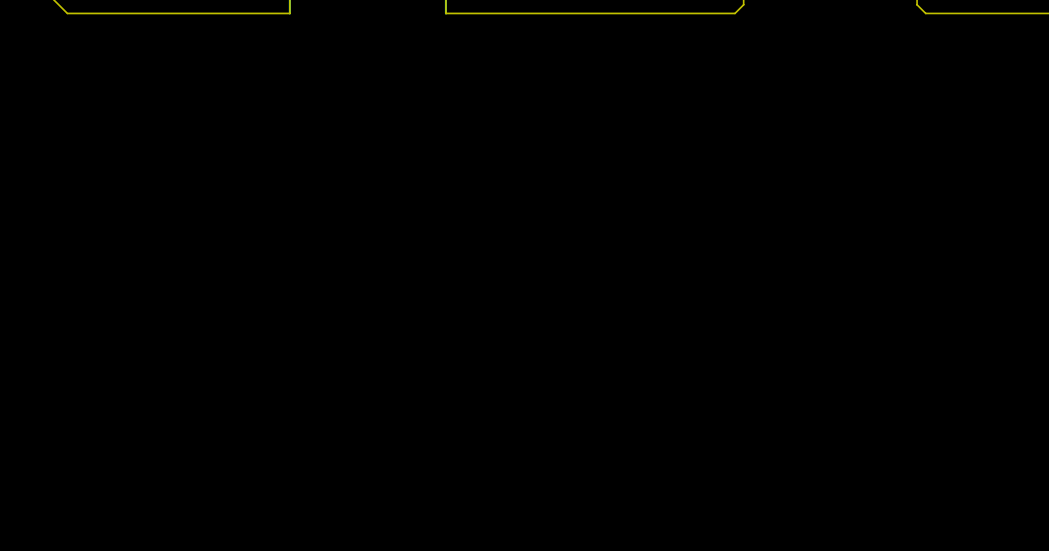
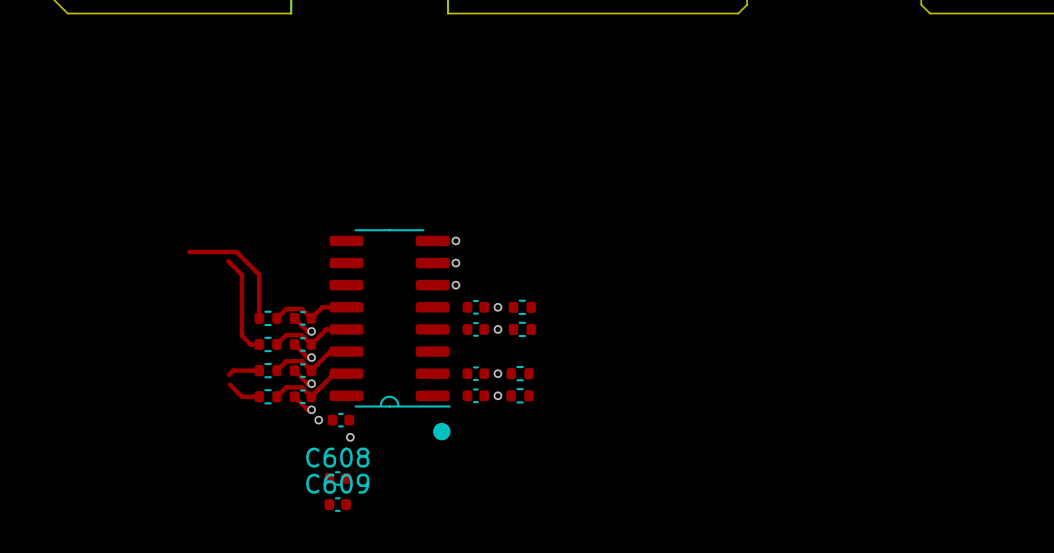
via: none -> (455, 240)
track: none -> (189, 251) (236, 251) (259, 274) (259, 318)
track: none -> (228, 261) (241, 274) (241, 335) (250, 344) (259, 344)
via: none -> (455, 263)
via: none -> (455, 285)
track: none -> (346, 307) (322, 307) (311, 318) (301, 308) (286, 308) (276, 318)
part: none -> (475, 307)
via: none -> (497, 307)
part: none -> (522, 307)
part: none -> (268, 318)
track: none -> (294, 318) (307, 331) (311, 331)
part: none -> (302, 318)
track: none -> (346, 329) (326, 329) (311, 344) (301, 335) (286, 335) (276, 344)
part: none -> (475, 329)
via: none -> (497, 329)
part: none -> (522, 329)
via: none -> (311, 331)
part: none -> (390, 334)
part: none -> (268, 344)
track: none -> (294, 344) (307, 357) (311, 357)
part: none -> (302, 344)
track: none -> (346, 351) (330, 351) (311, 370) (301, 361) (286, 361) (276, 370)
via: none -> (311, 357)
track: none -> (259, 370) (233, 370) (228, 374)
part: none -> (268, 370)
track: none -> (294, 370) (307, 383) (311, 383)
part: none -> (302, 370)
track: none -> (346, 373) (334, 373) (311, 396) (301, 387) (286, 387) (276, 396)
part: none -> (475, 373)
via: none -> (497, 373)
part: none -> (520, 373)
via: none -> (311, 383)
track: none -> (229, 384) (241, 396) (259, 396)
part: none -> (475, 395)
via: none -> (497, 395)
part: none -> (520, 395)
part: none -> (268, 396)
track: none -> (294, 396) (307, 409) (311, 409)
part: none -> (302, 396)
via: none -> (311, 409)
via: none -> (318, 420)
part: none -> (340, 420)
via: none -> (350, 437)
C608: none -> (337, 478)
C609: none -> (337, 504)

